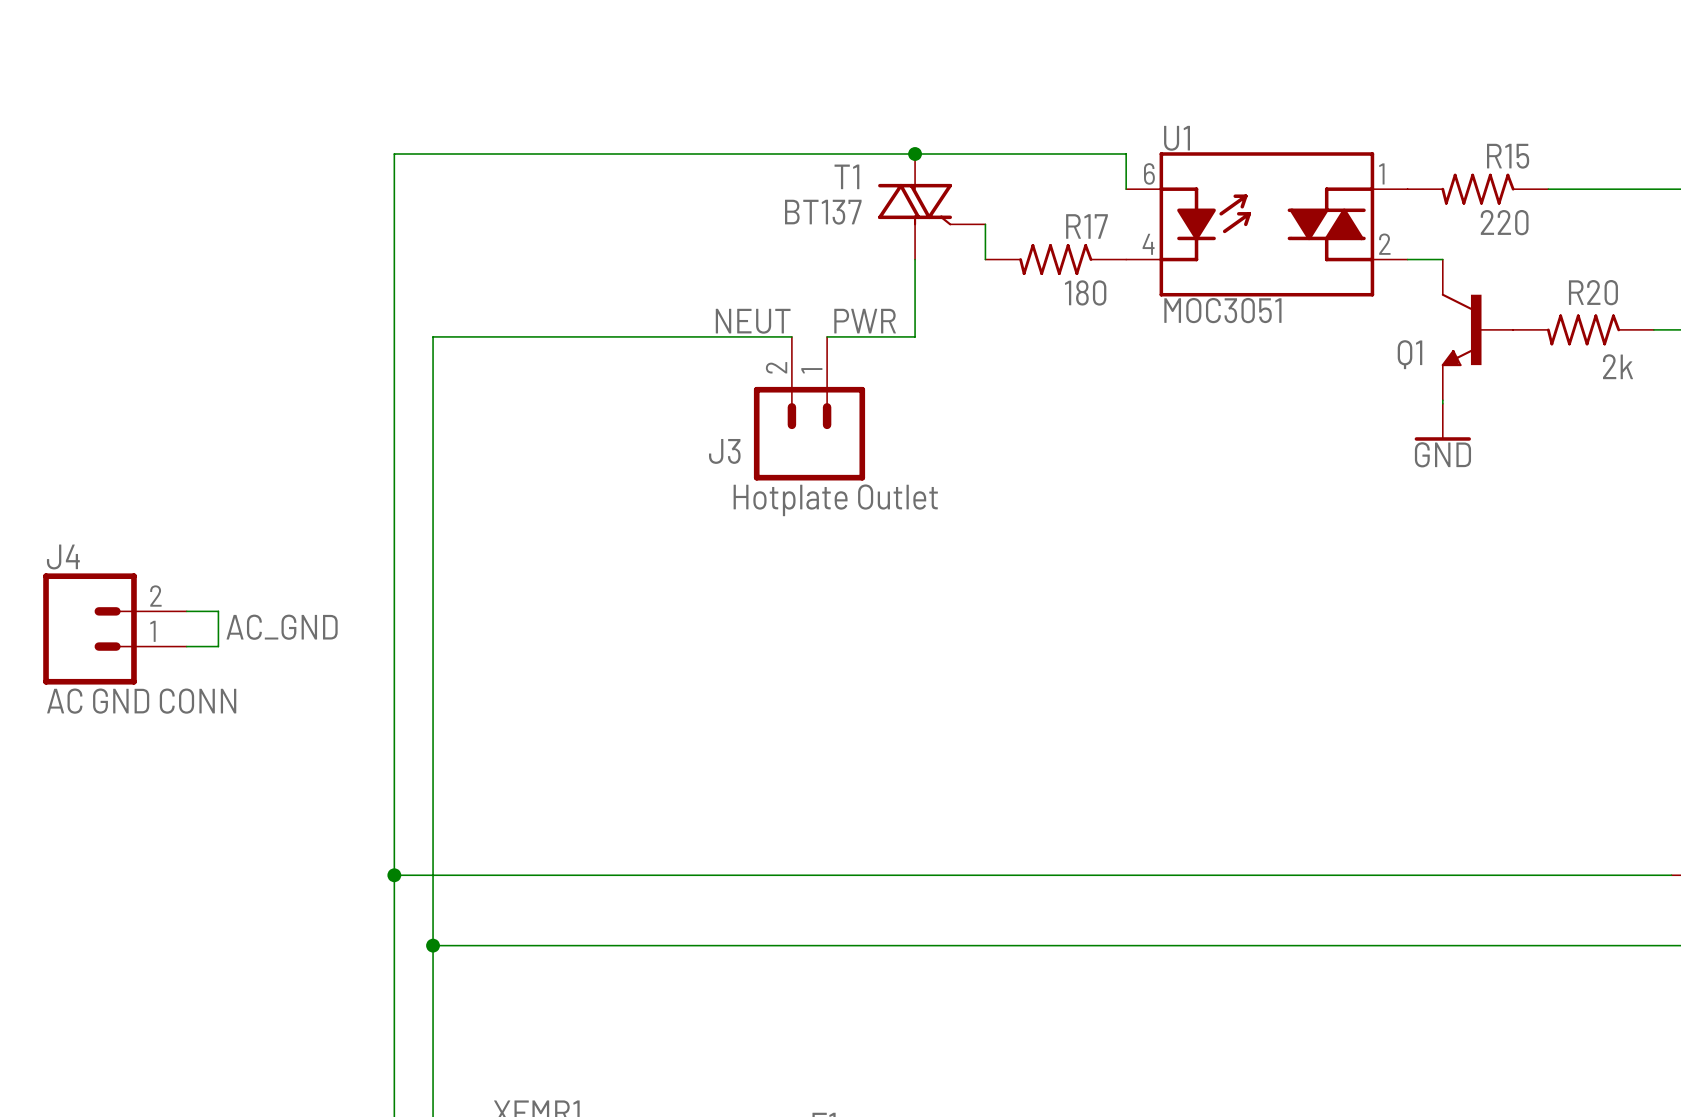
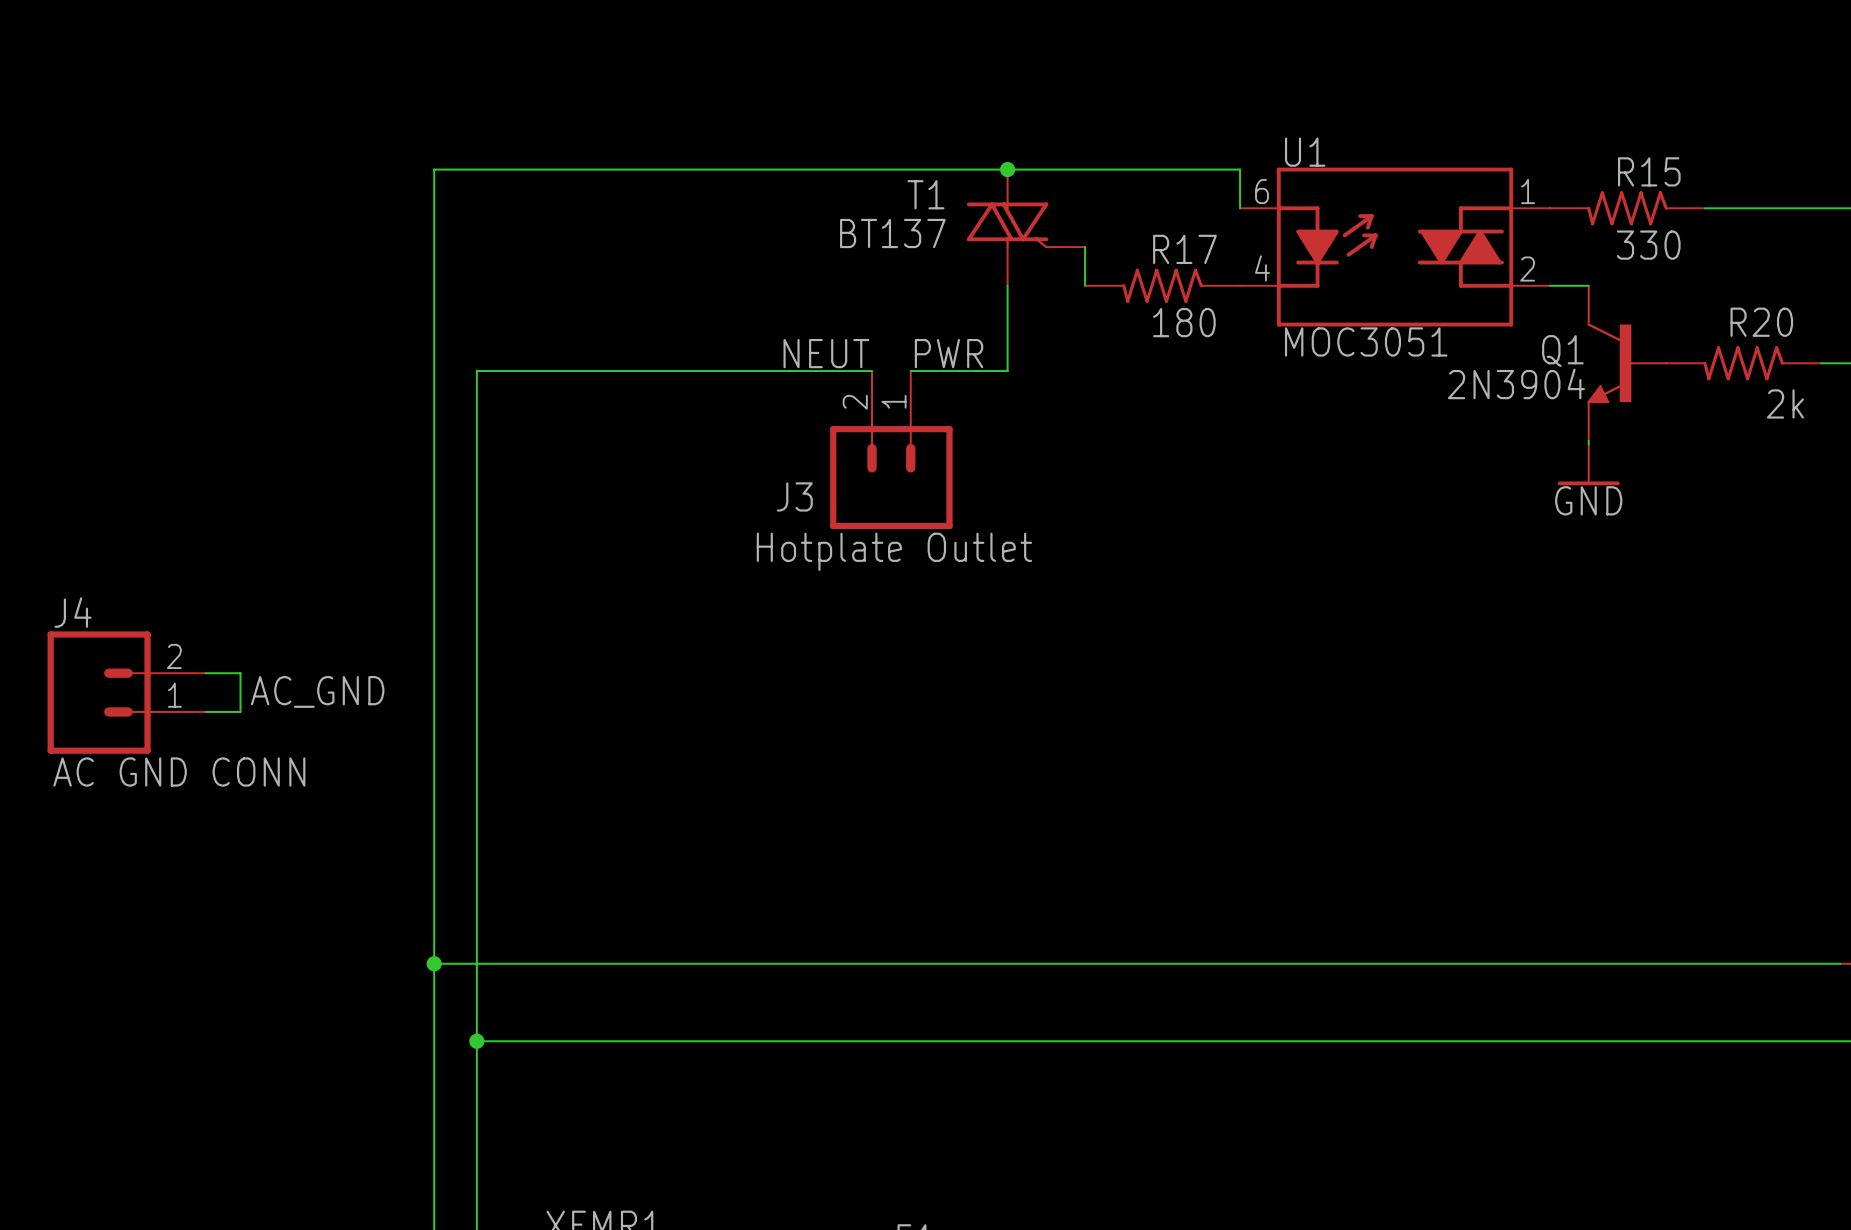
R15 value: 220 (1504, 222) -> 330 (1648, 245)
Q1 value: none -> 2N3904 (1516, 383)
Q1 name position: Q1 (1410, 354) -> Q1 (1562, 351)

